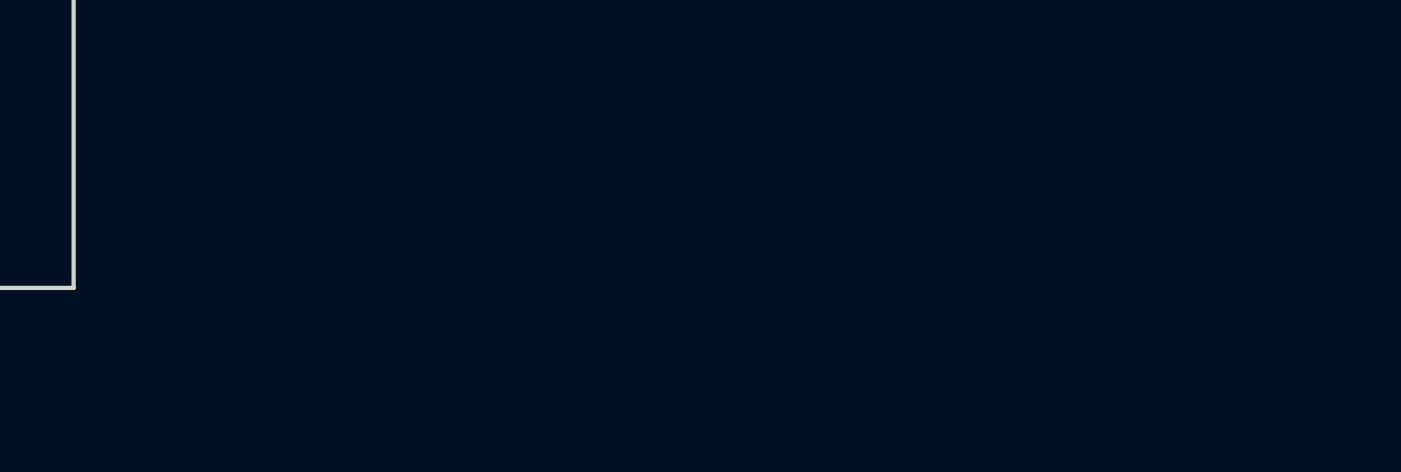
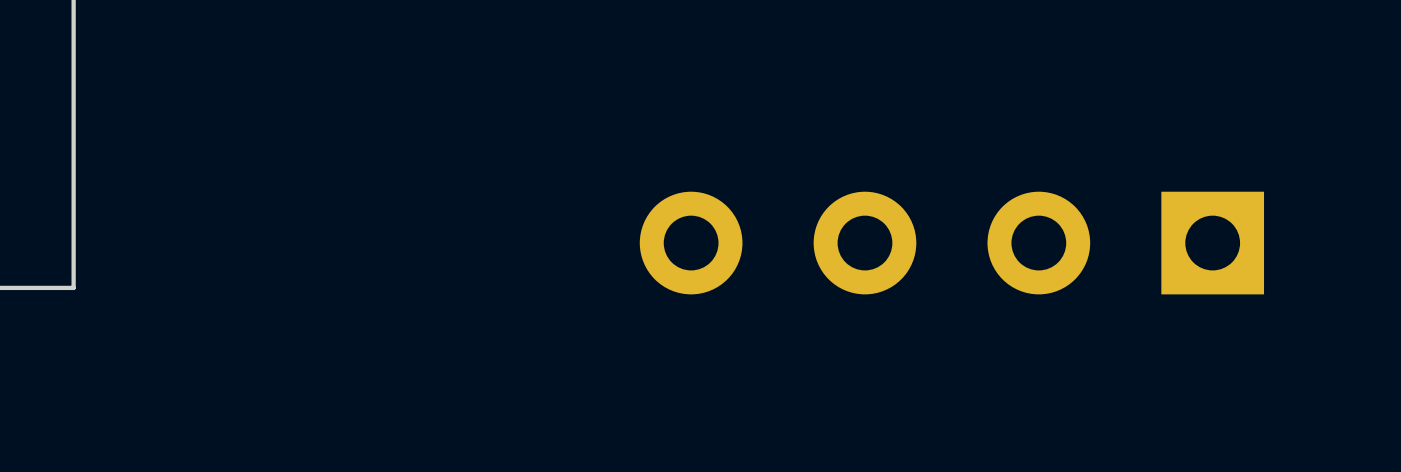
part: none -> (951, 243)

